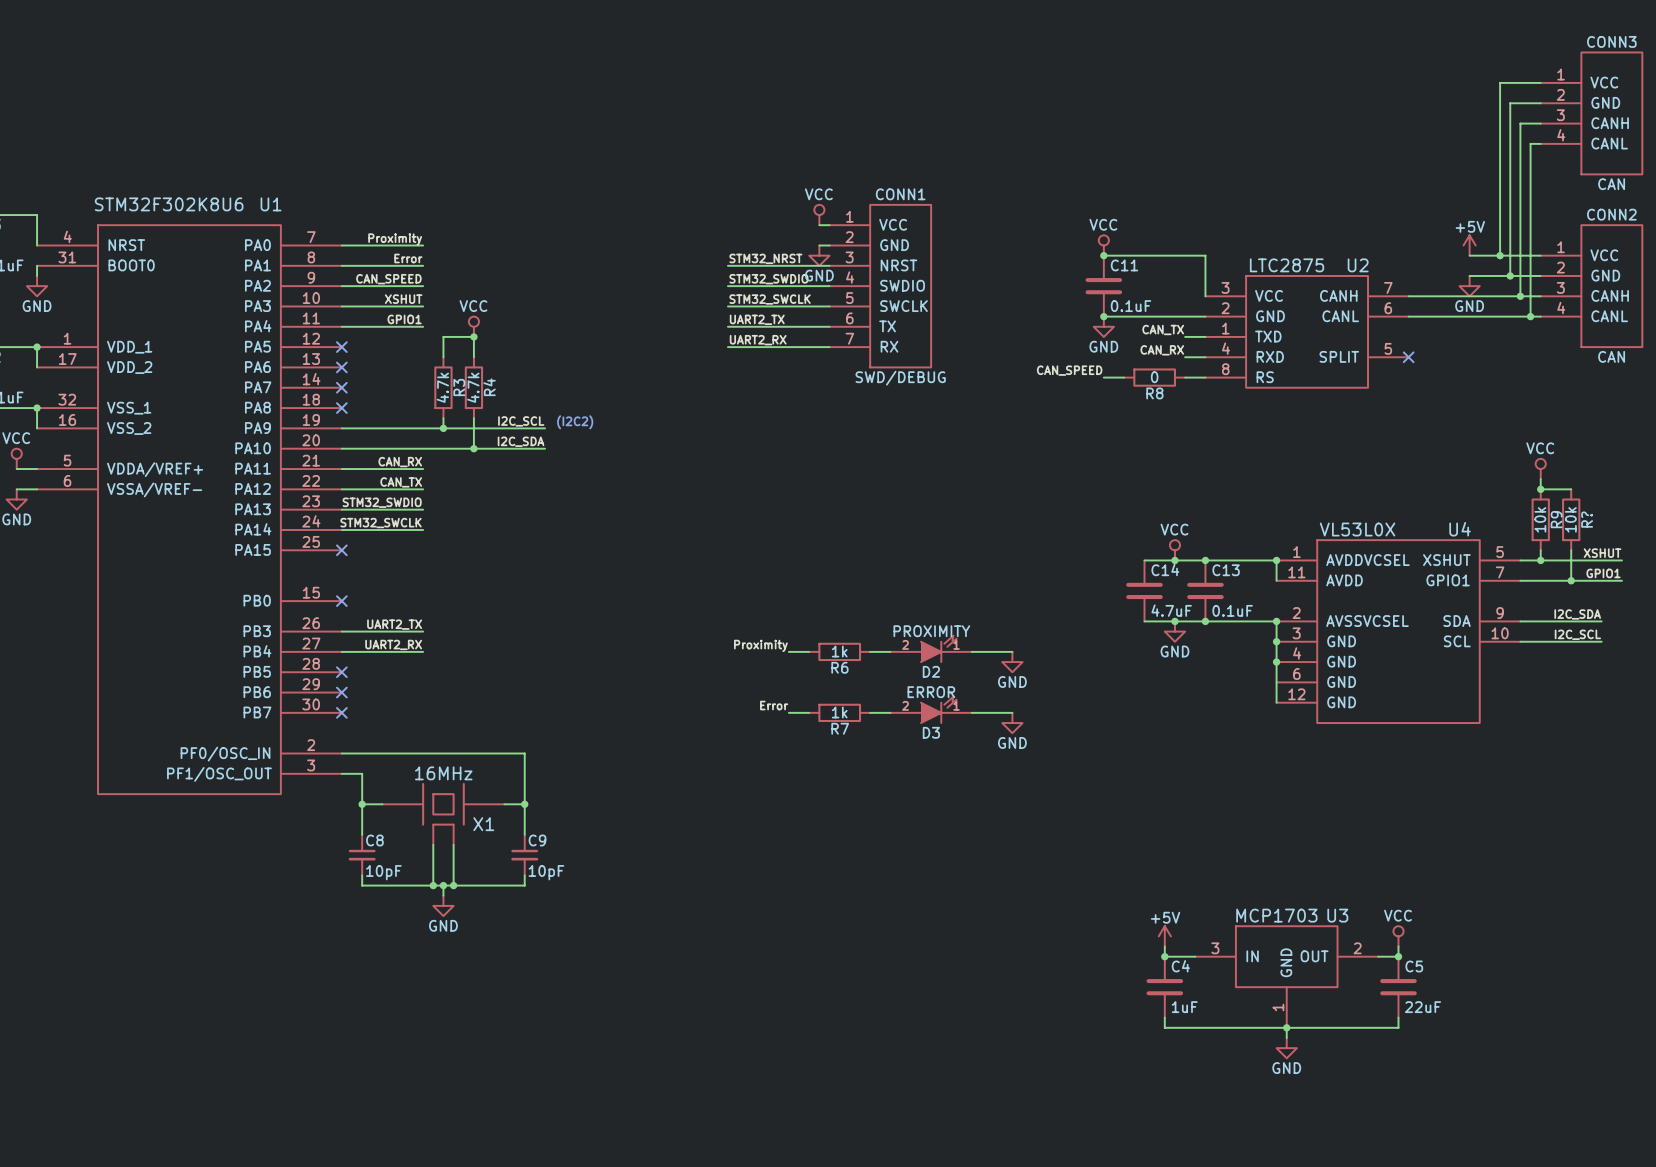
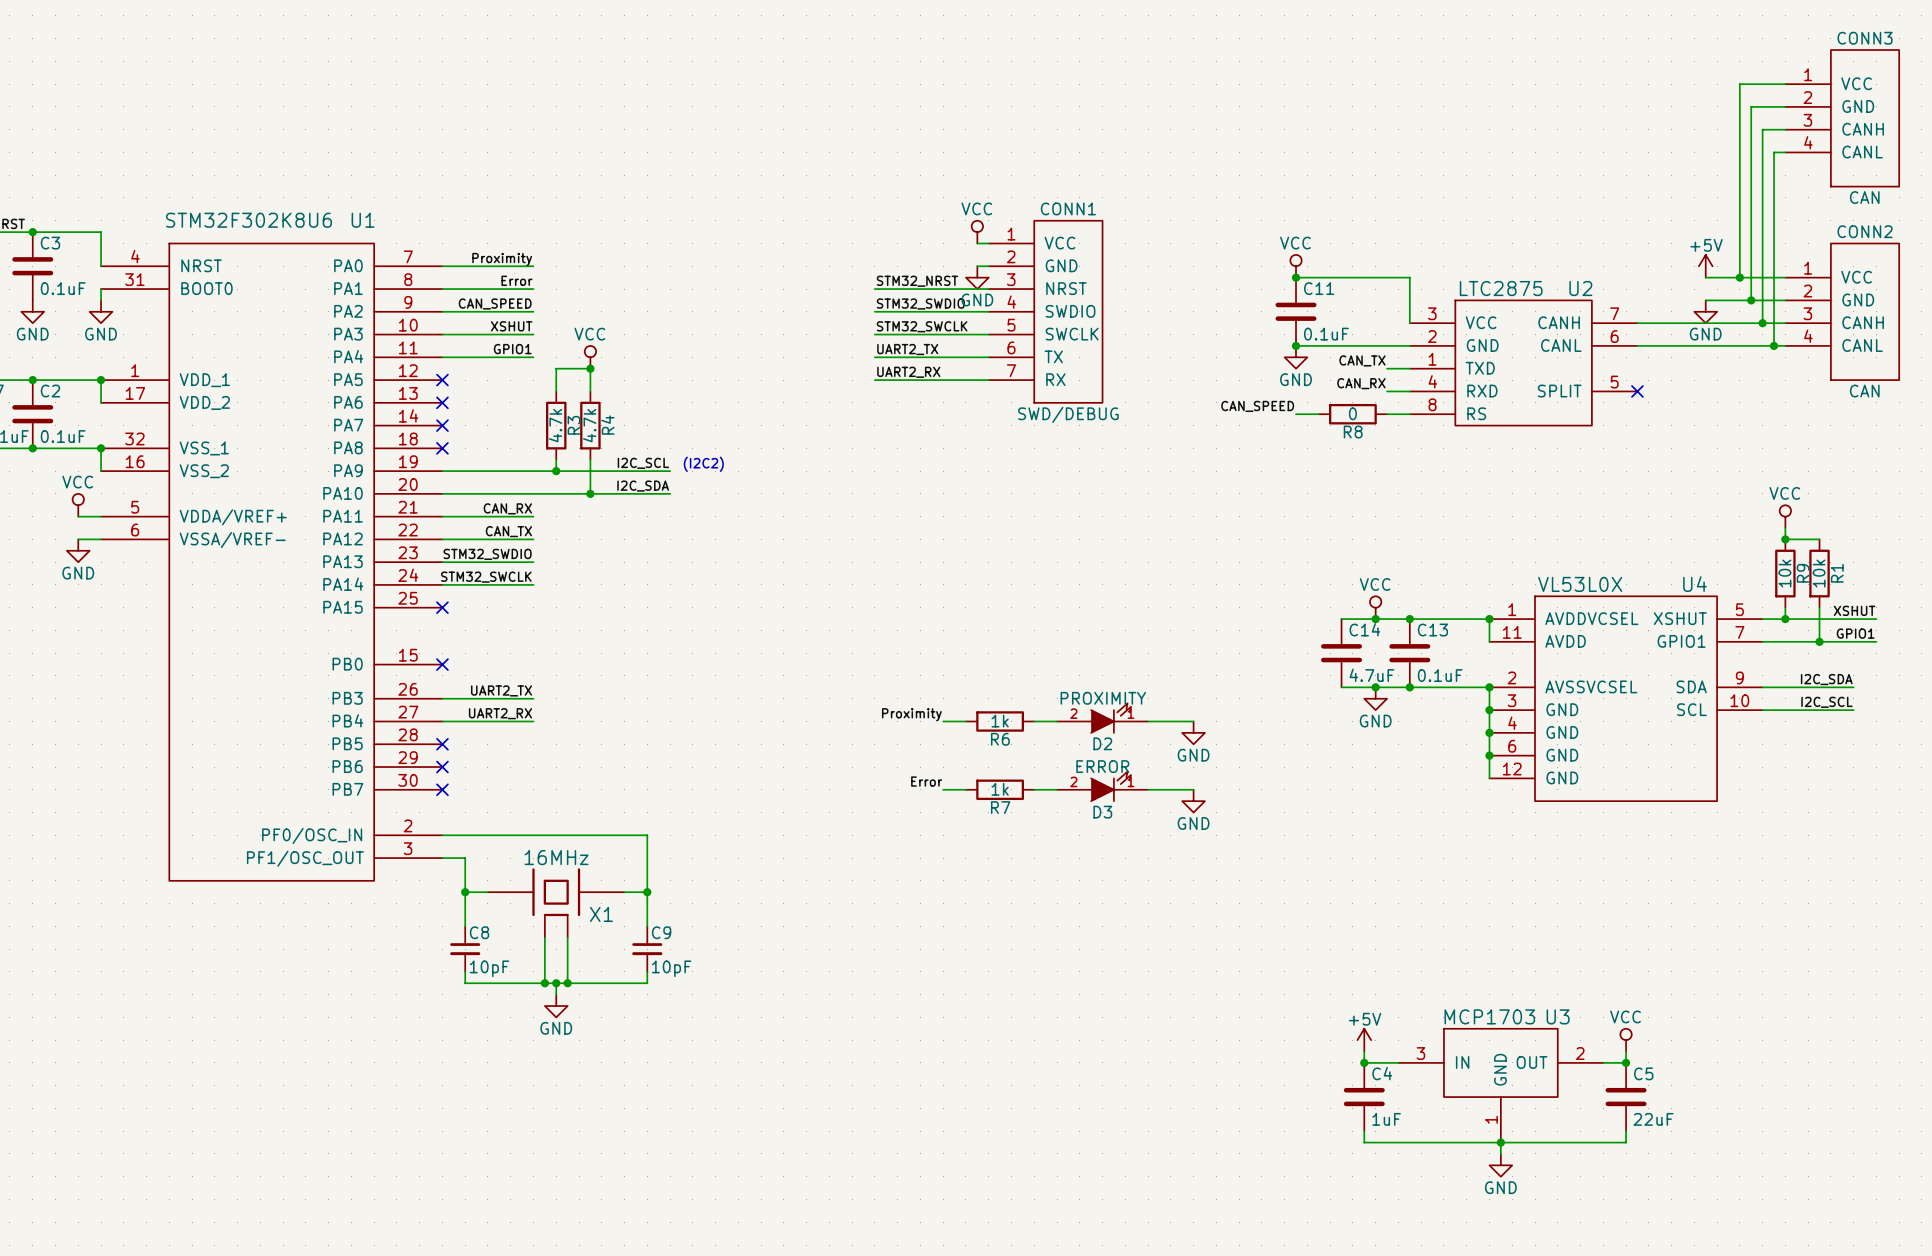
R? name: R? (1587, 519) -> R1 (1837, 573)
junction: none -> (1489, 755)

